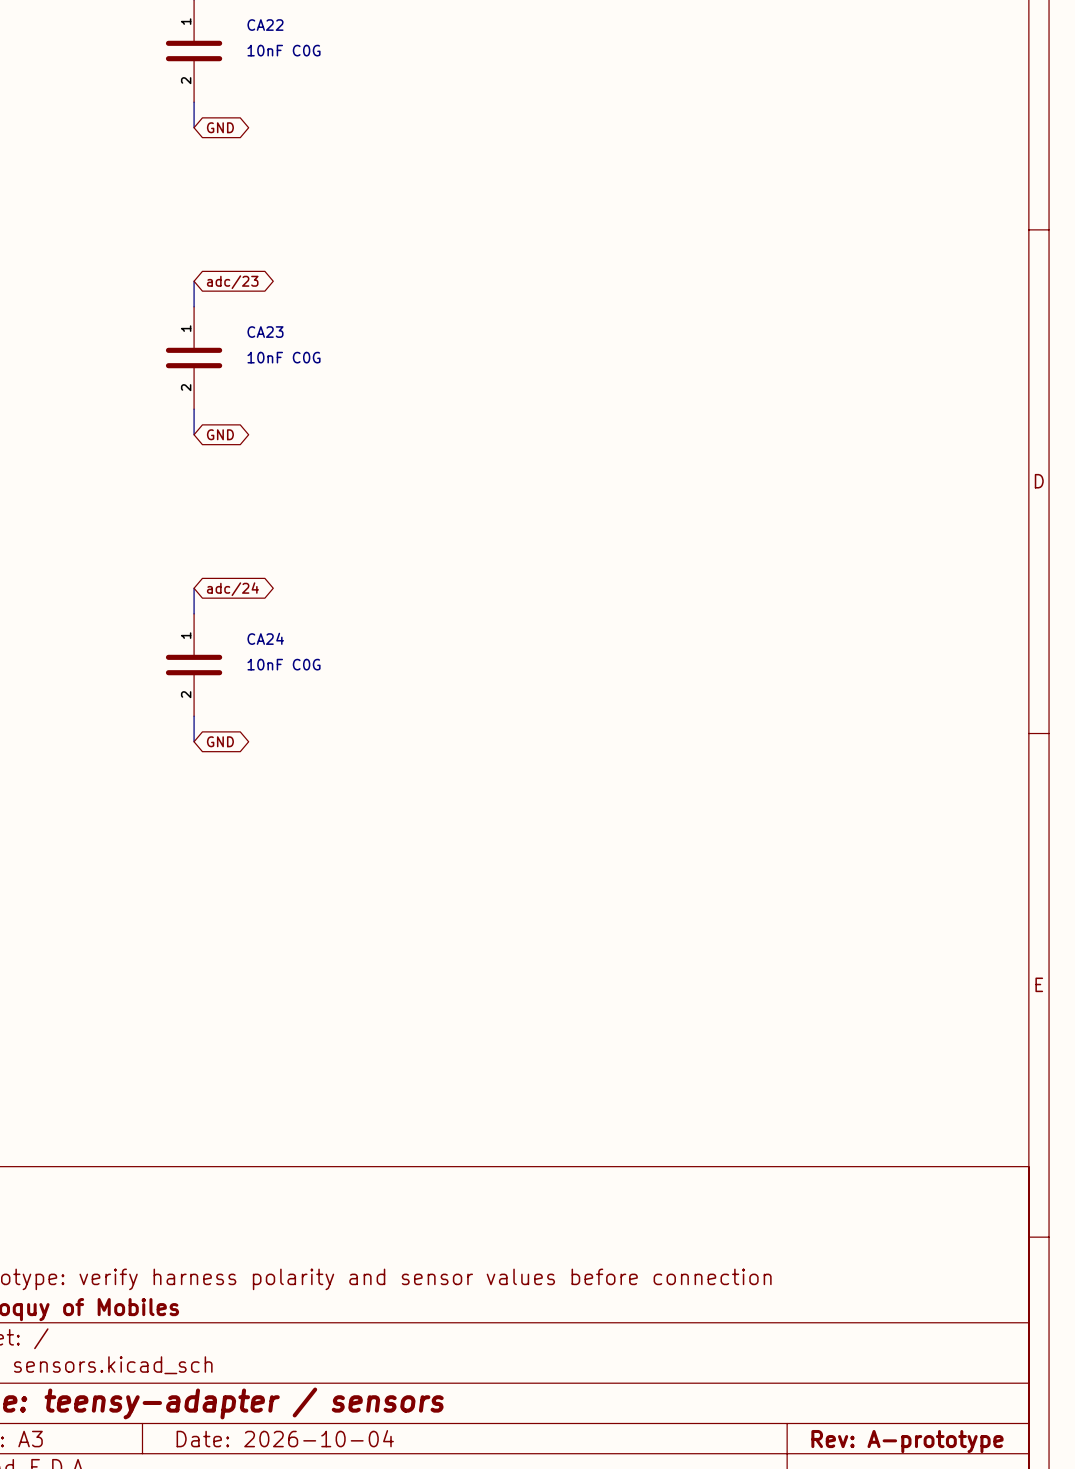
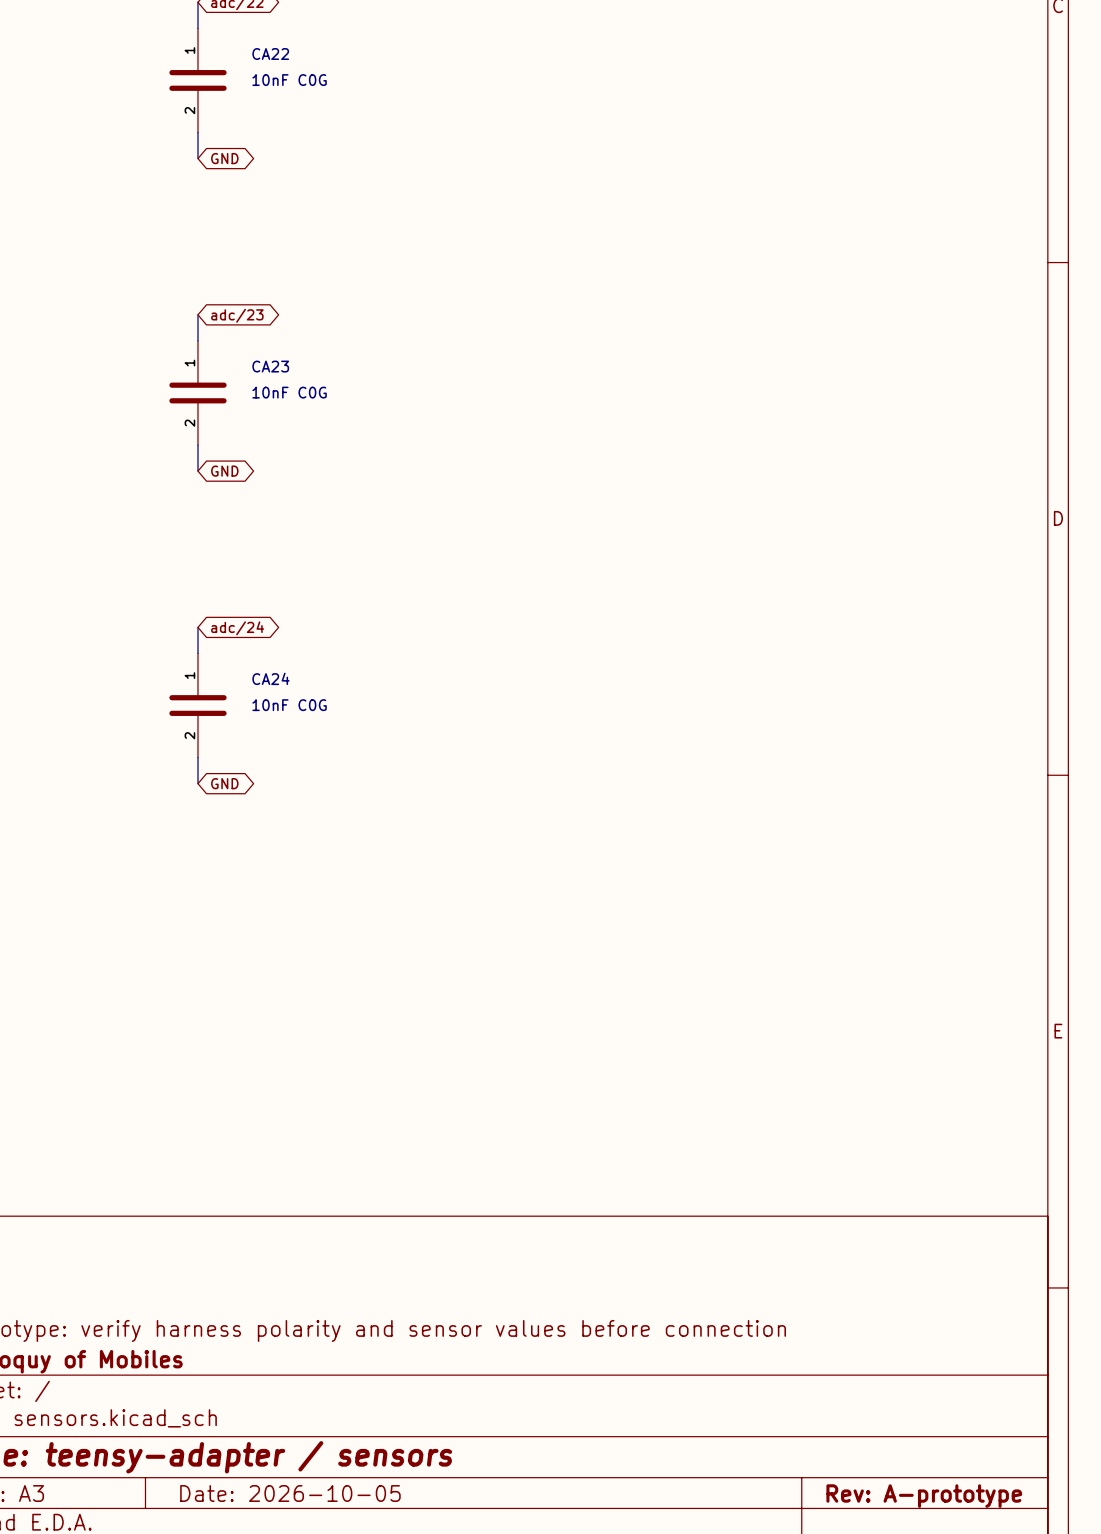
title block: Date: 2026-10-04 (285, 1438) -> Date: 2026-10-05 (290, 1493)

